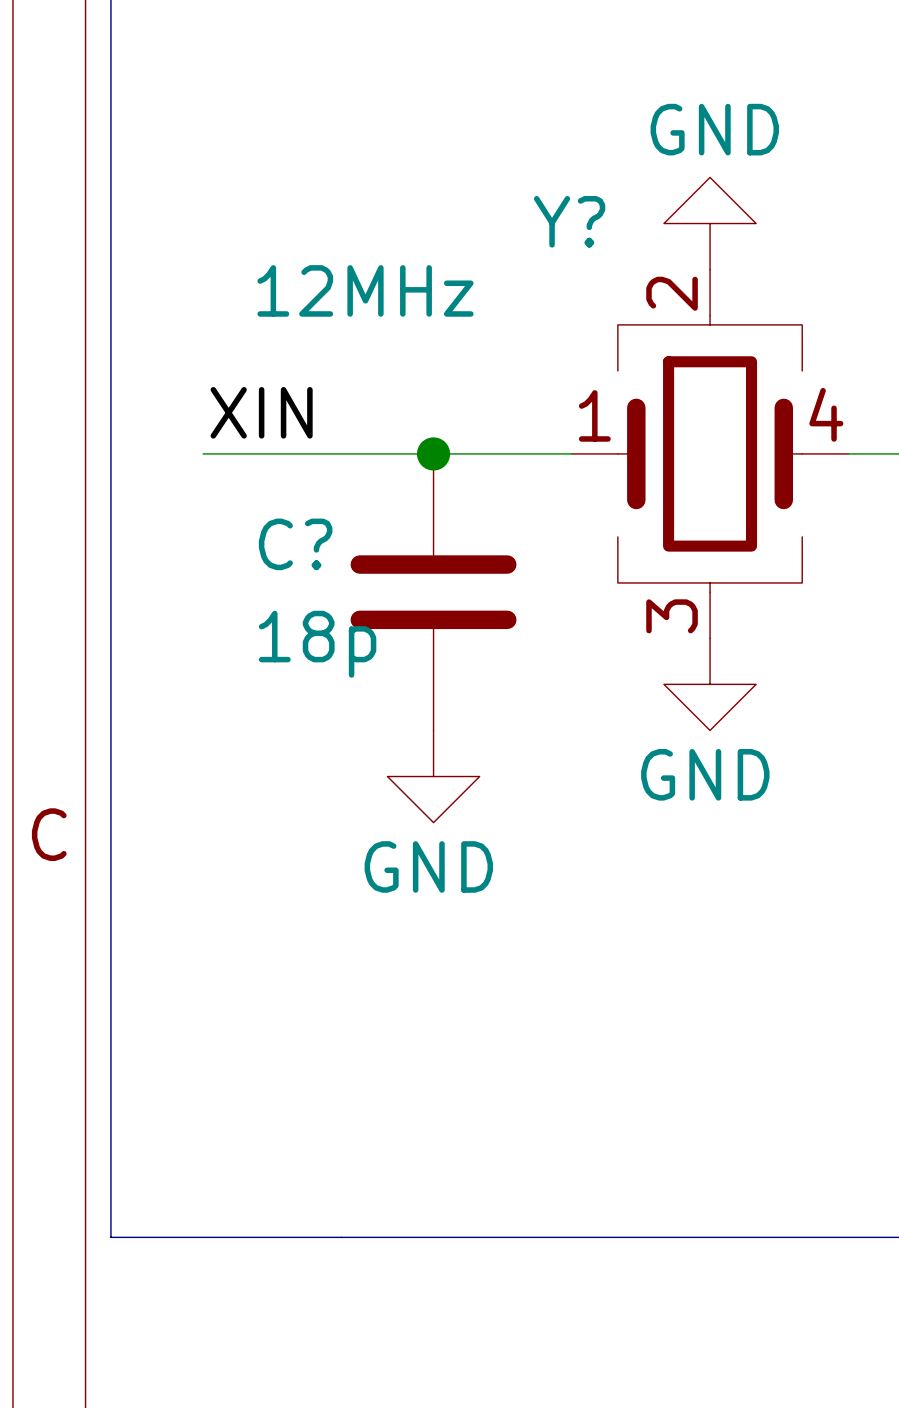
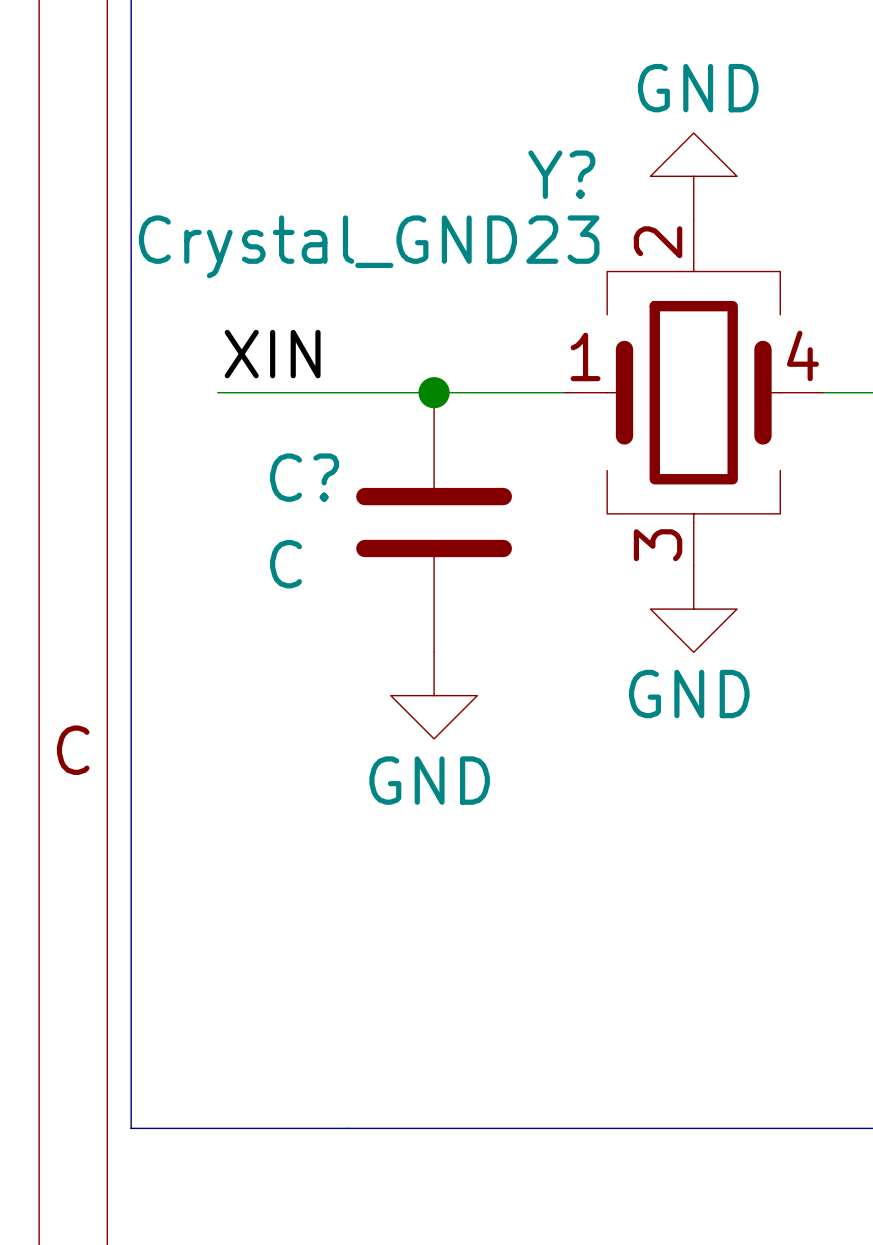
Y? value: 12MHz (365, 290) -> Crystal_GND23 (369, 246)
C? value: 18p (317, 644) -> C (286, 564)

